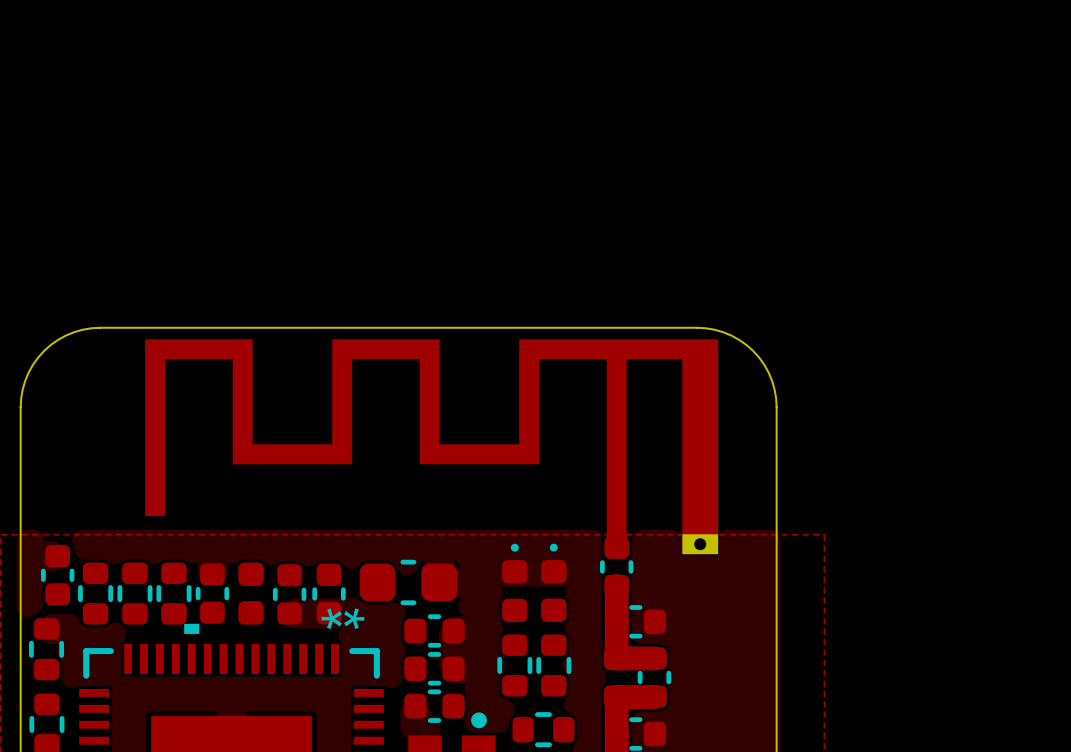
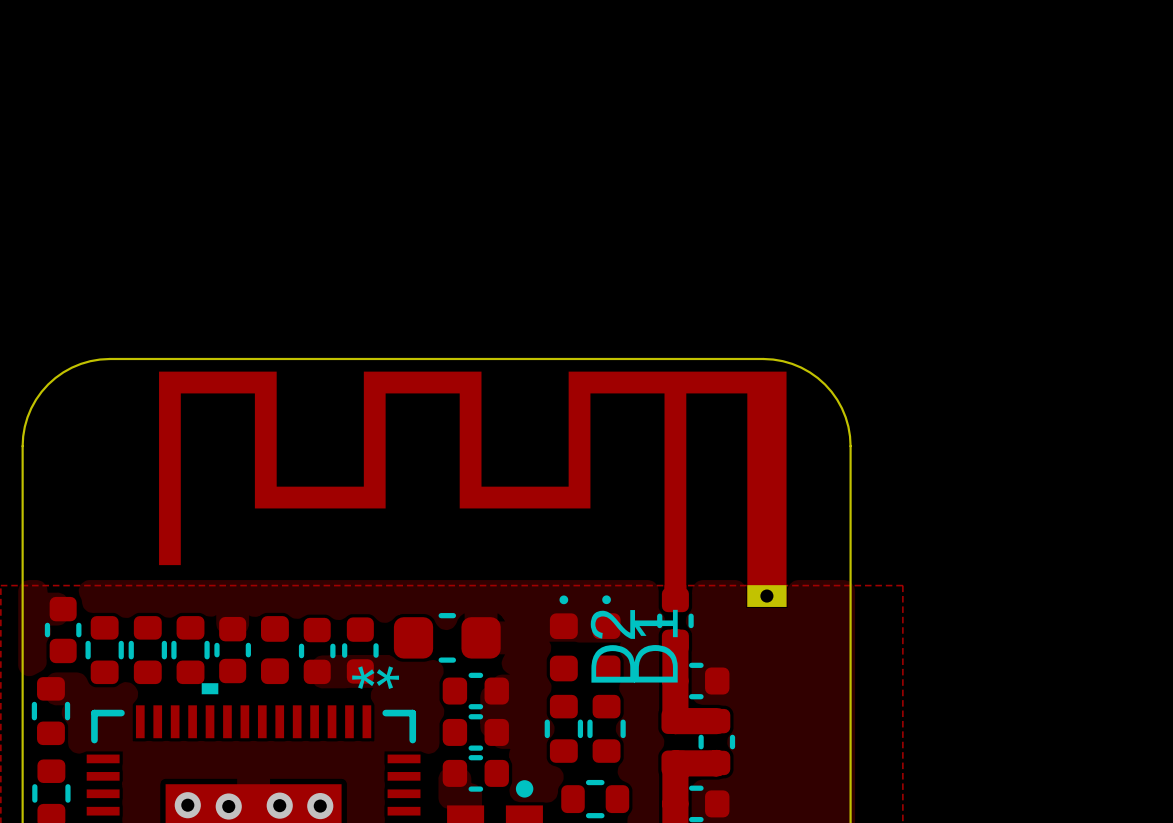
D2 name: none -> D2 (612, 646)
D1 name: none -> D1 (655, 646)
via: none -> (187, 805)
via: none -> (279, 805)
via: none -> (228, 806)
via: none -> (320, 806)

